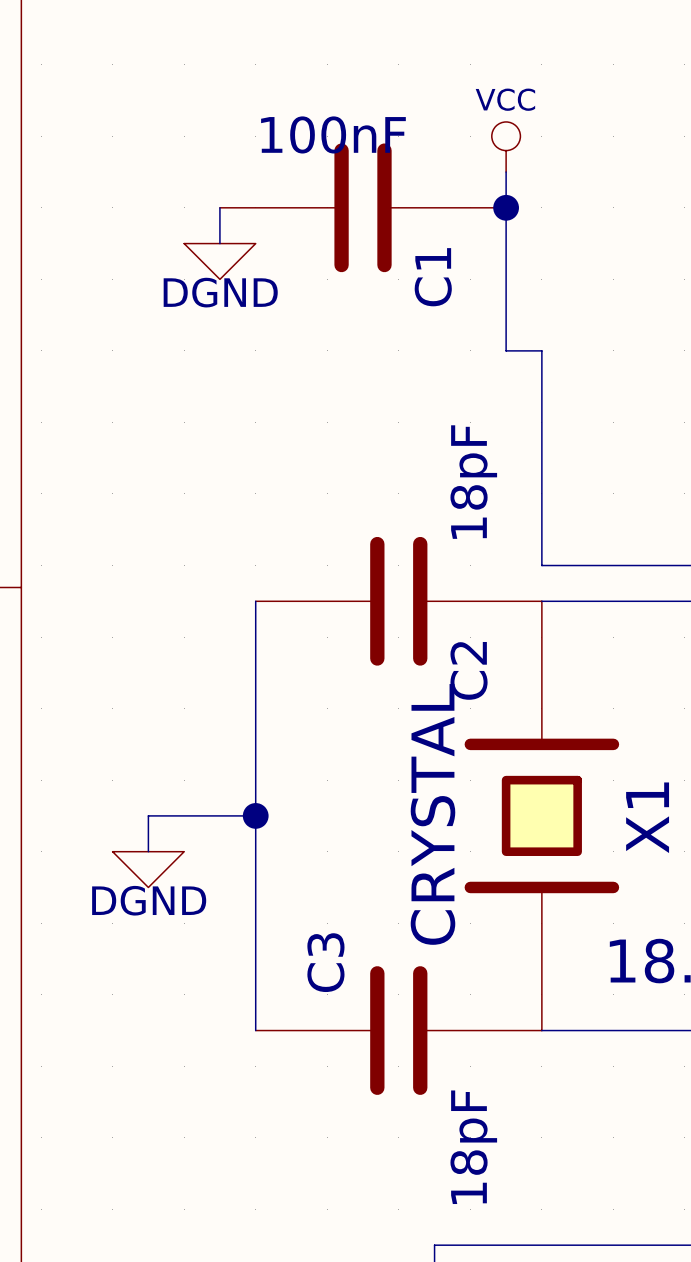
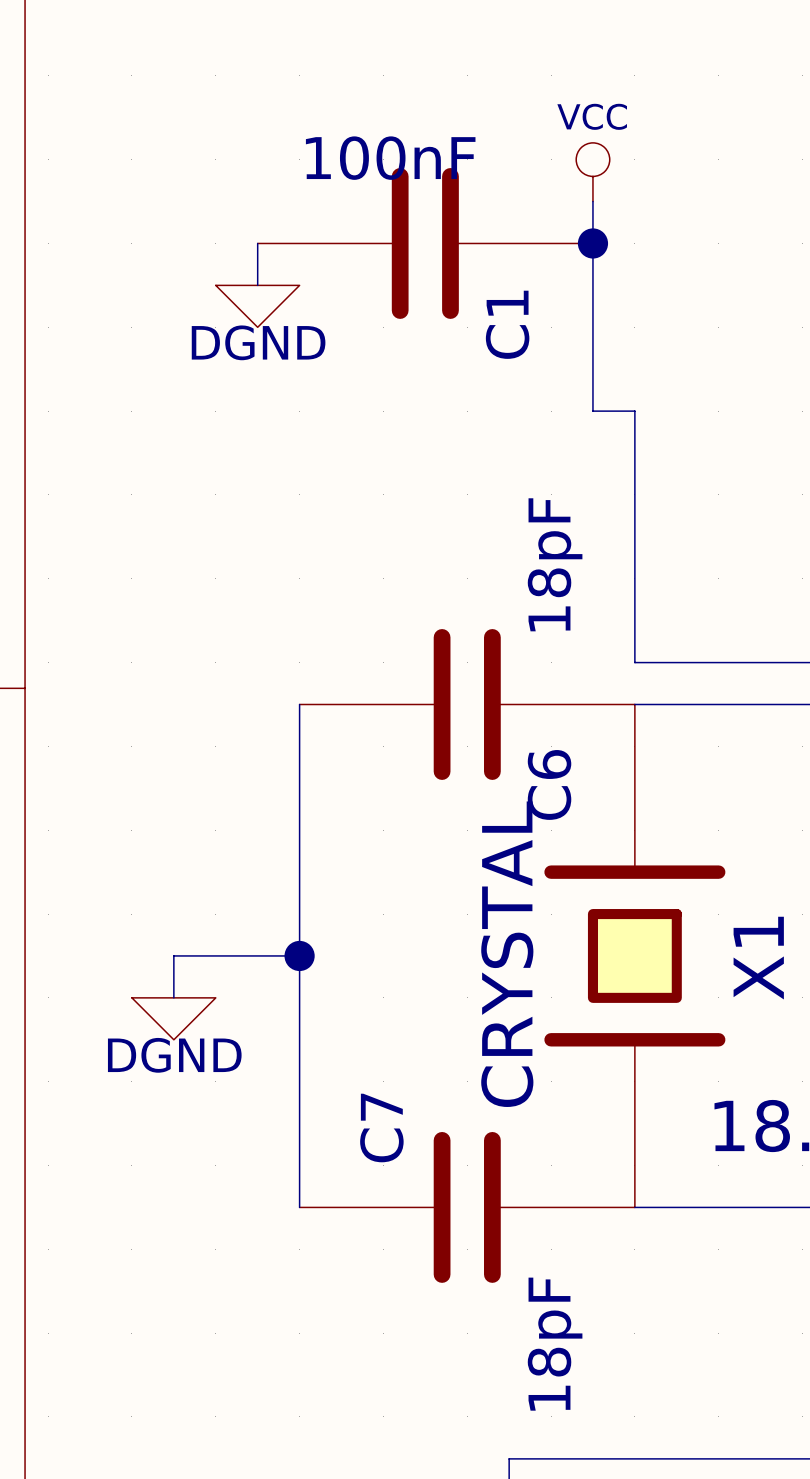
C2 name: C2 (469, 670) -> C6 (549, 784)
C3 name: C3 (325, 962) -> C7 (381, 1128)

